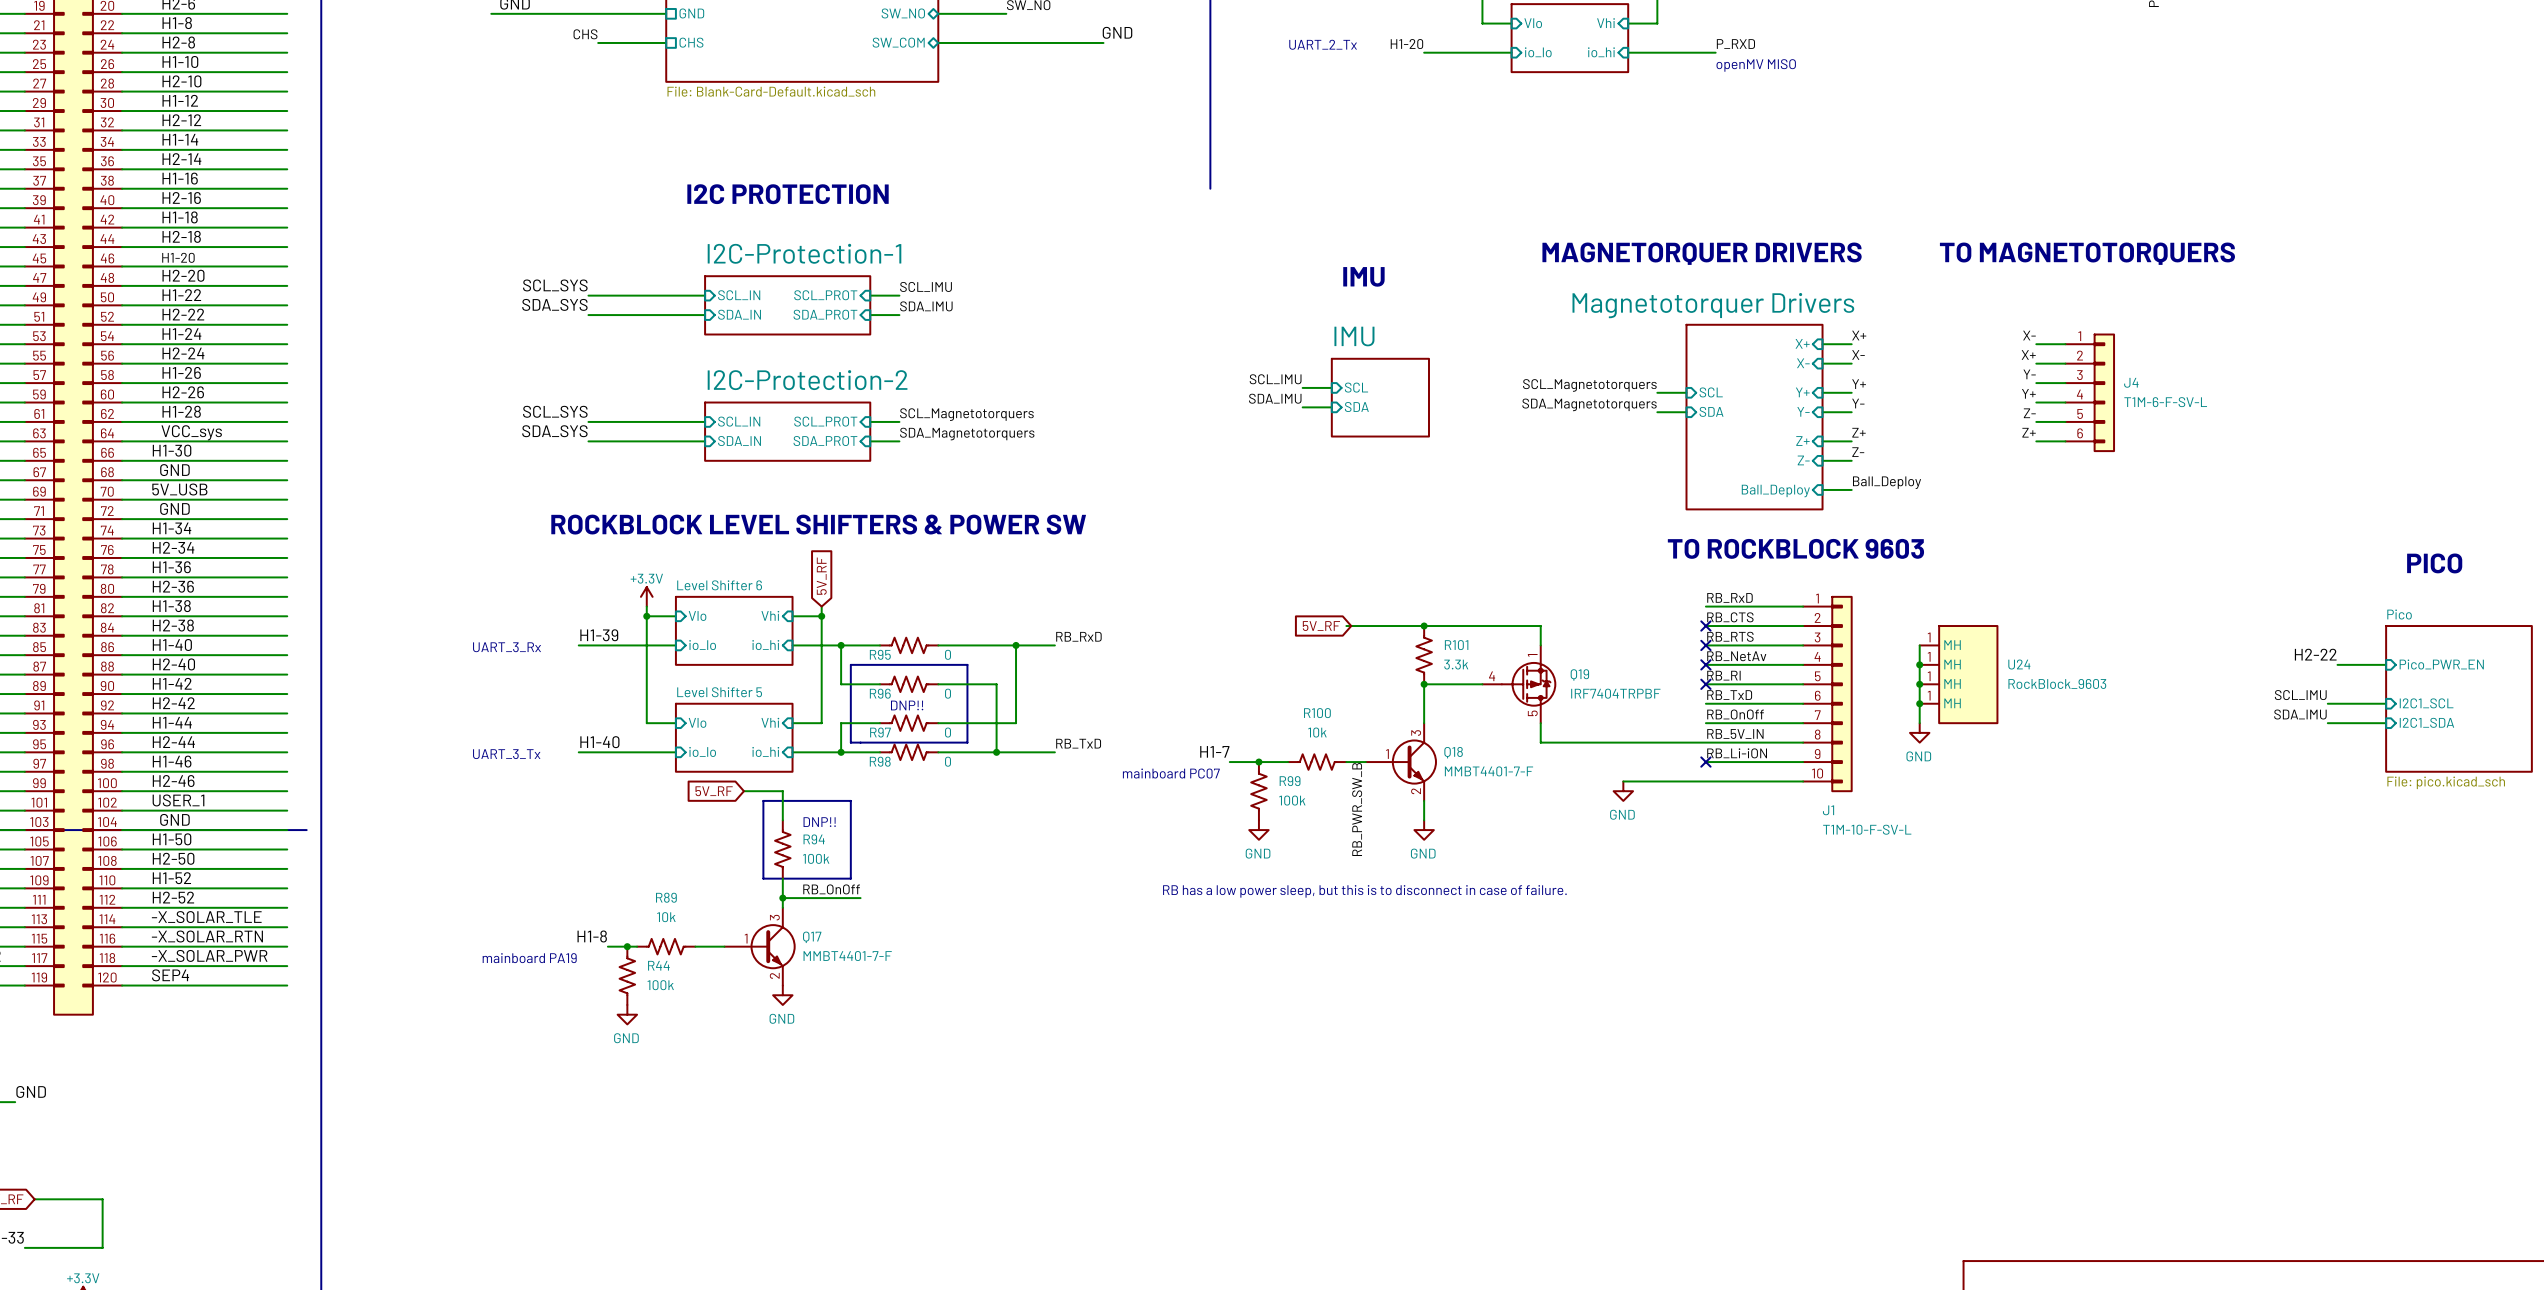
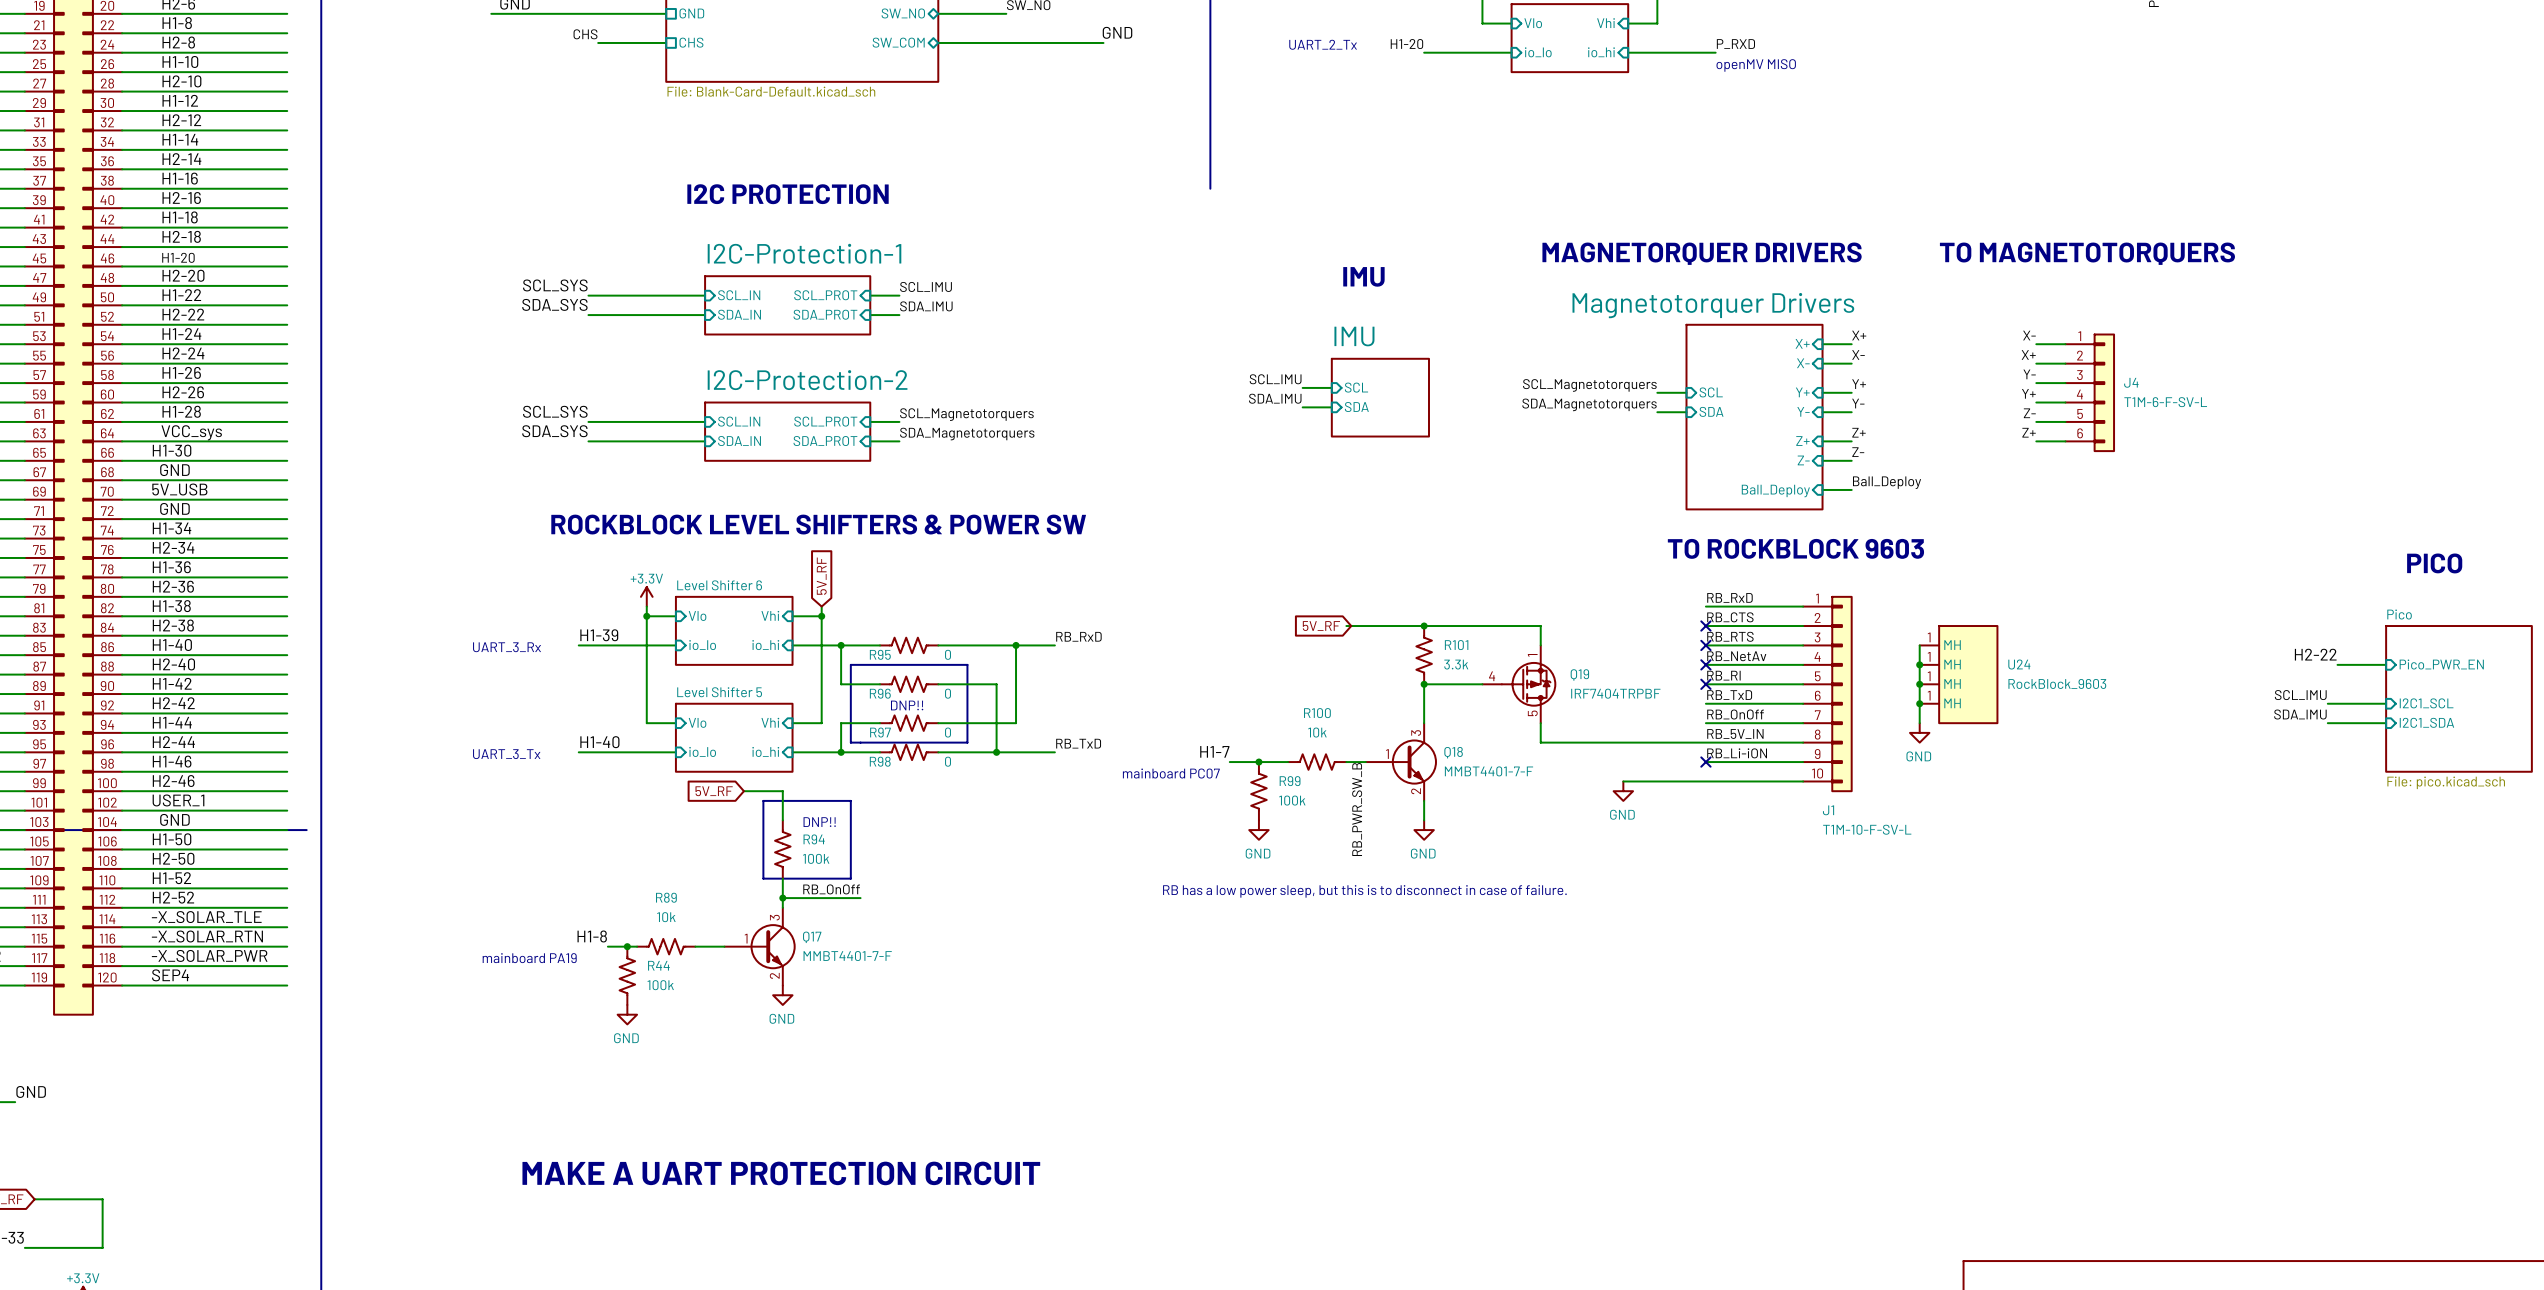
text: none -> MAKE A UART PROTECTION CIRCUIT (781, 1173)

